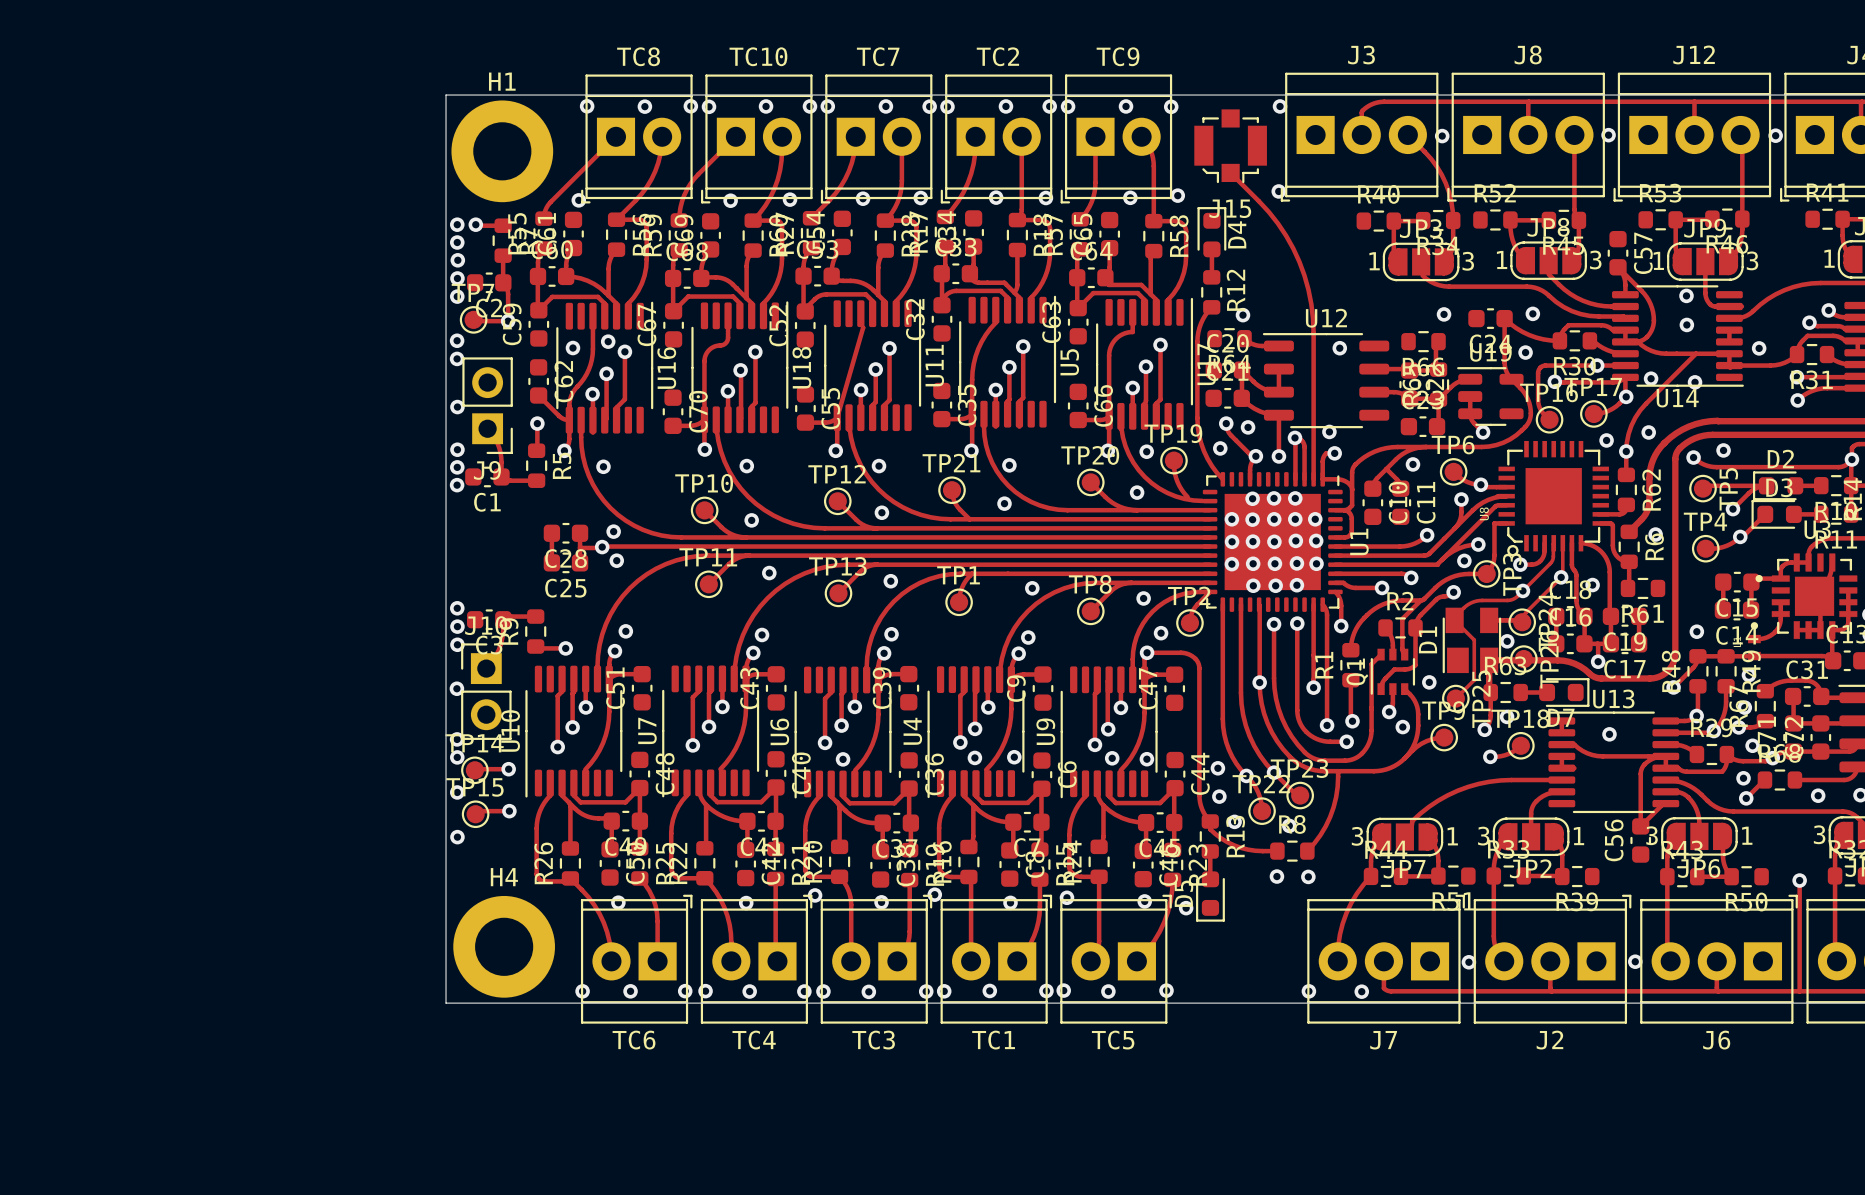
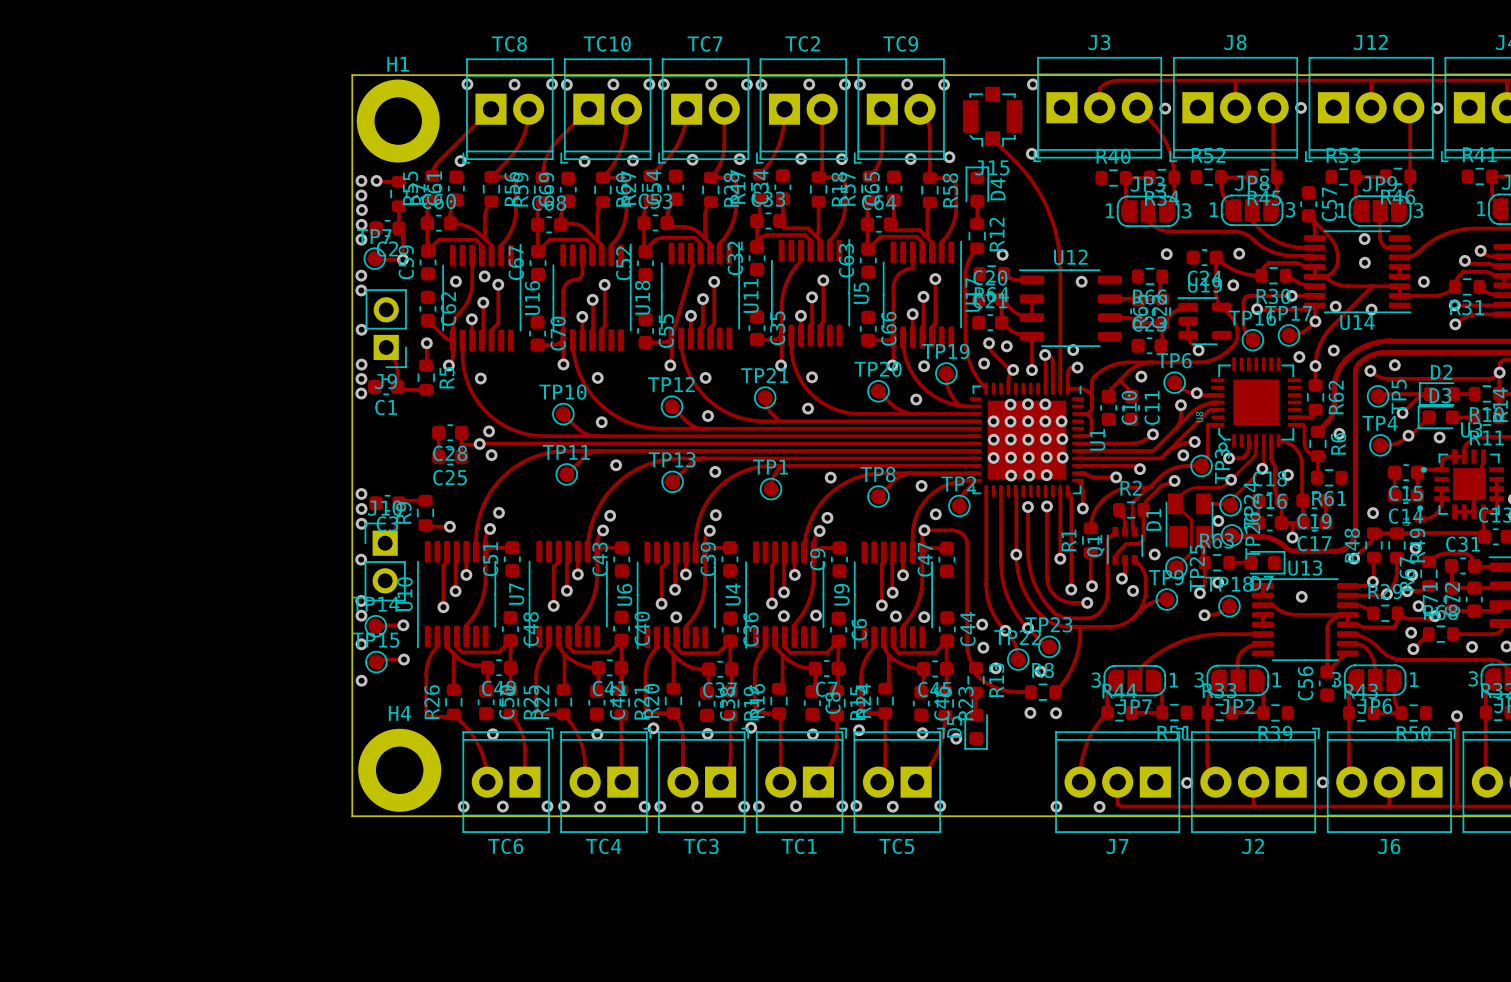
via: none -> (1439, 437)

